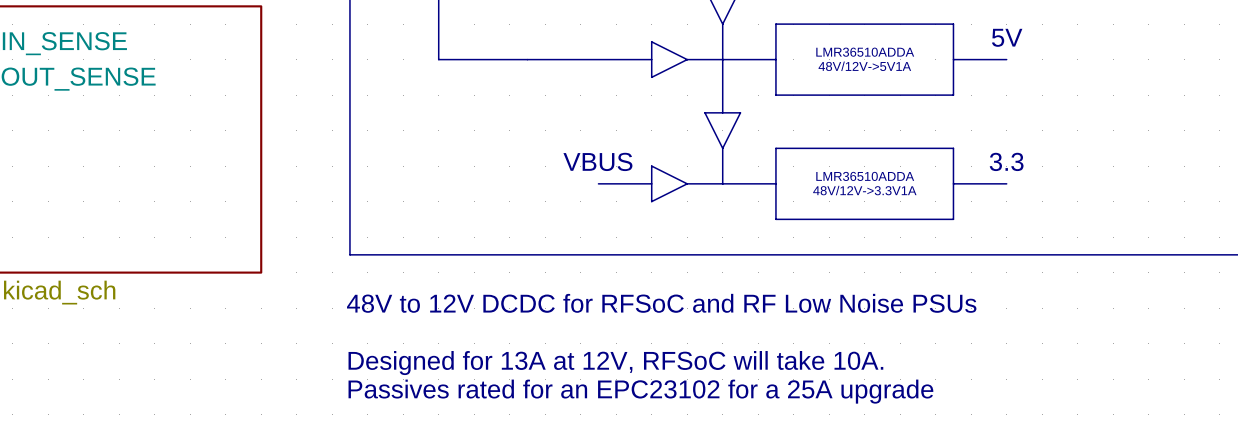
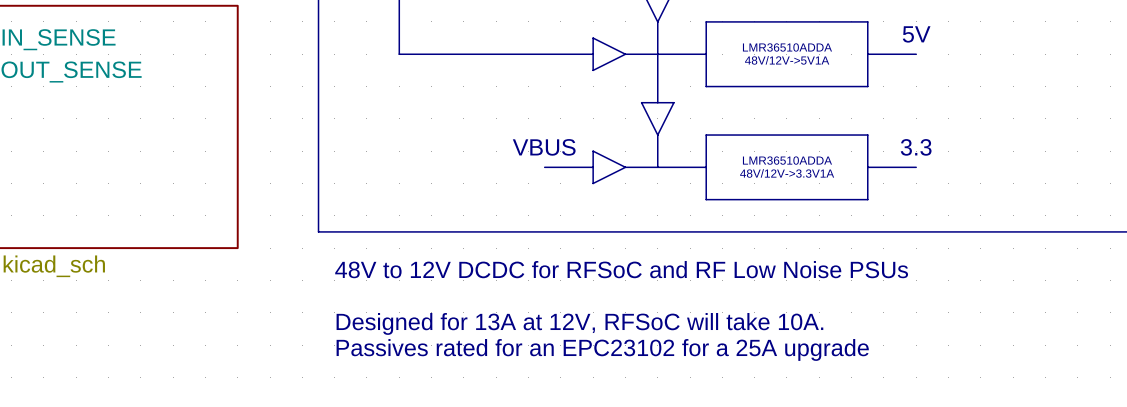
text position: 48V to 12V DCDC for RFSoC and RF Low Noise PSUs (661, 303) -> 48V to 12V DCDC for RFSoC and RF Low Noise PSUs (621, 269)
text position: Designed for 13A at 12V, RFSoC will take 10A. (615, 363) -> Designed for 13A at 12V, RFSoC will take 10A. (579, 323)
text position: Passives rated for an EPC23102 for a 25A upgrade (640, 391) -> Passives rated for an EPC23102 for a 25A upgrade (602, 349)

